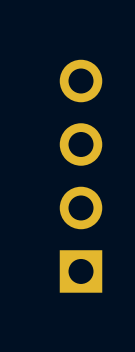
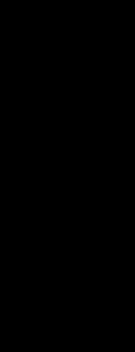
part: (81, 176) -> none

